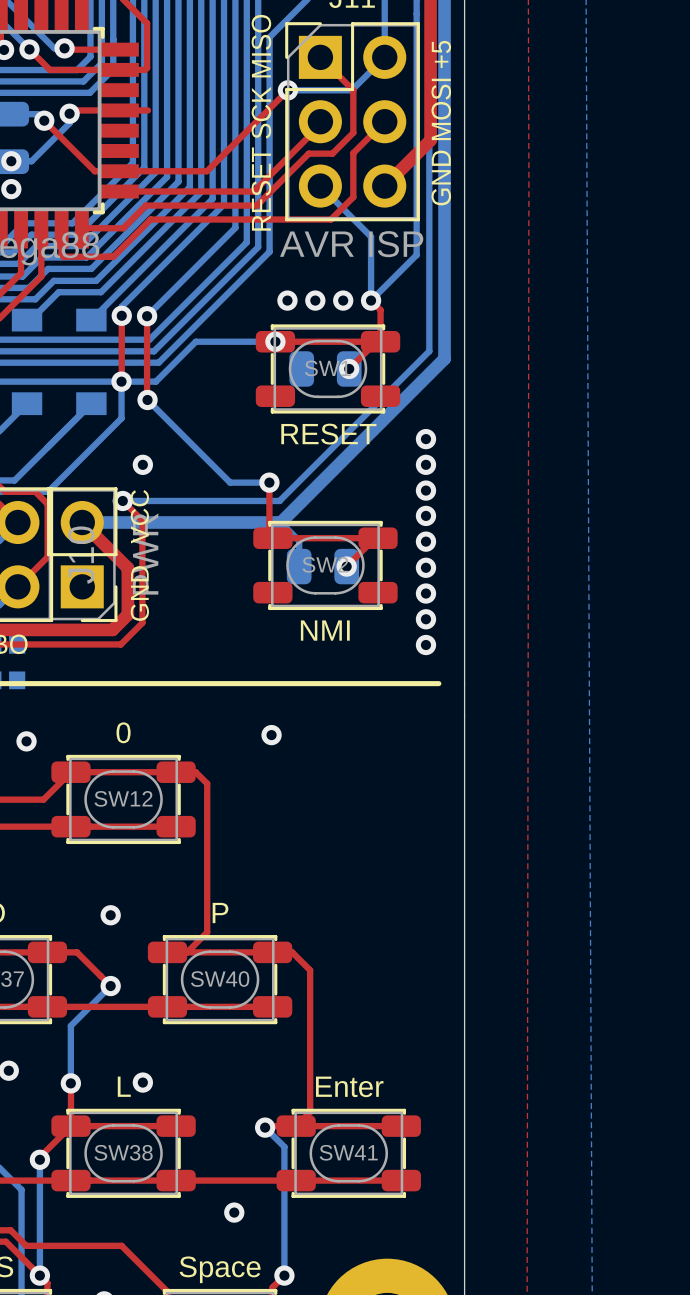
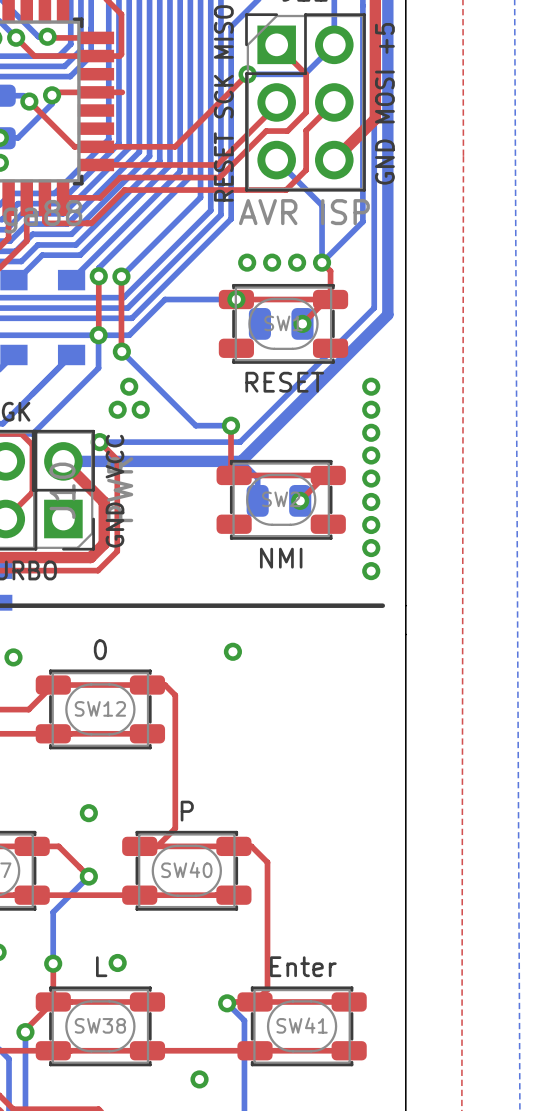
via: none -> (129, 386)
via: none -> (140, 409)

